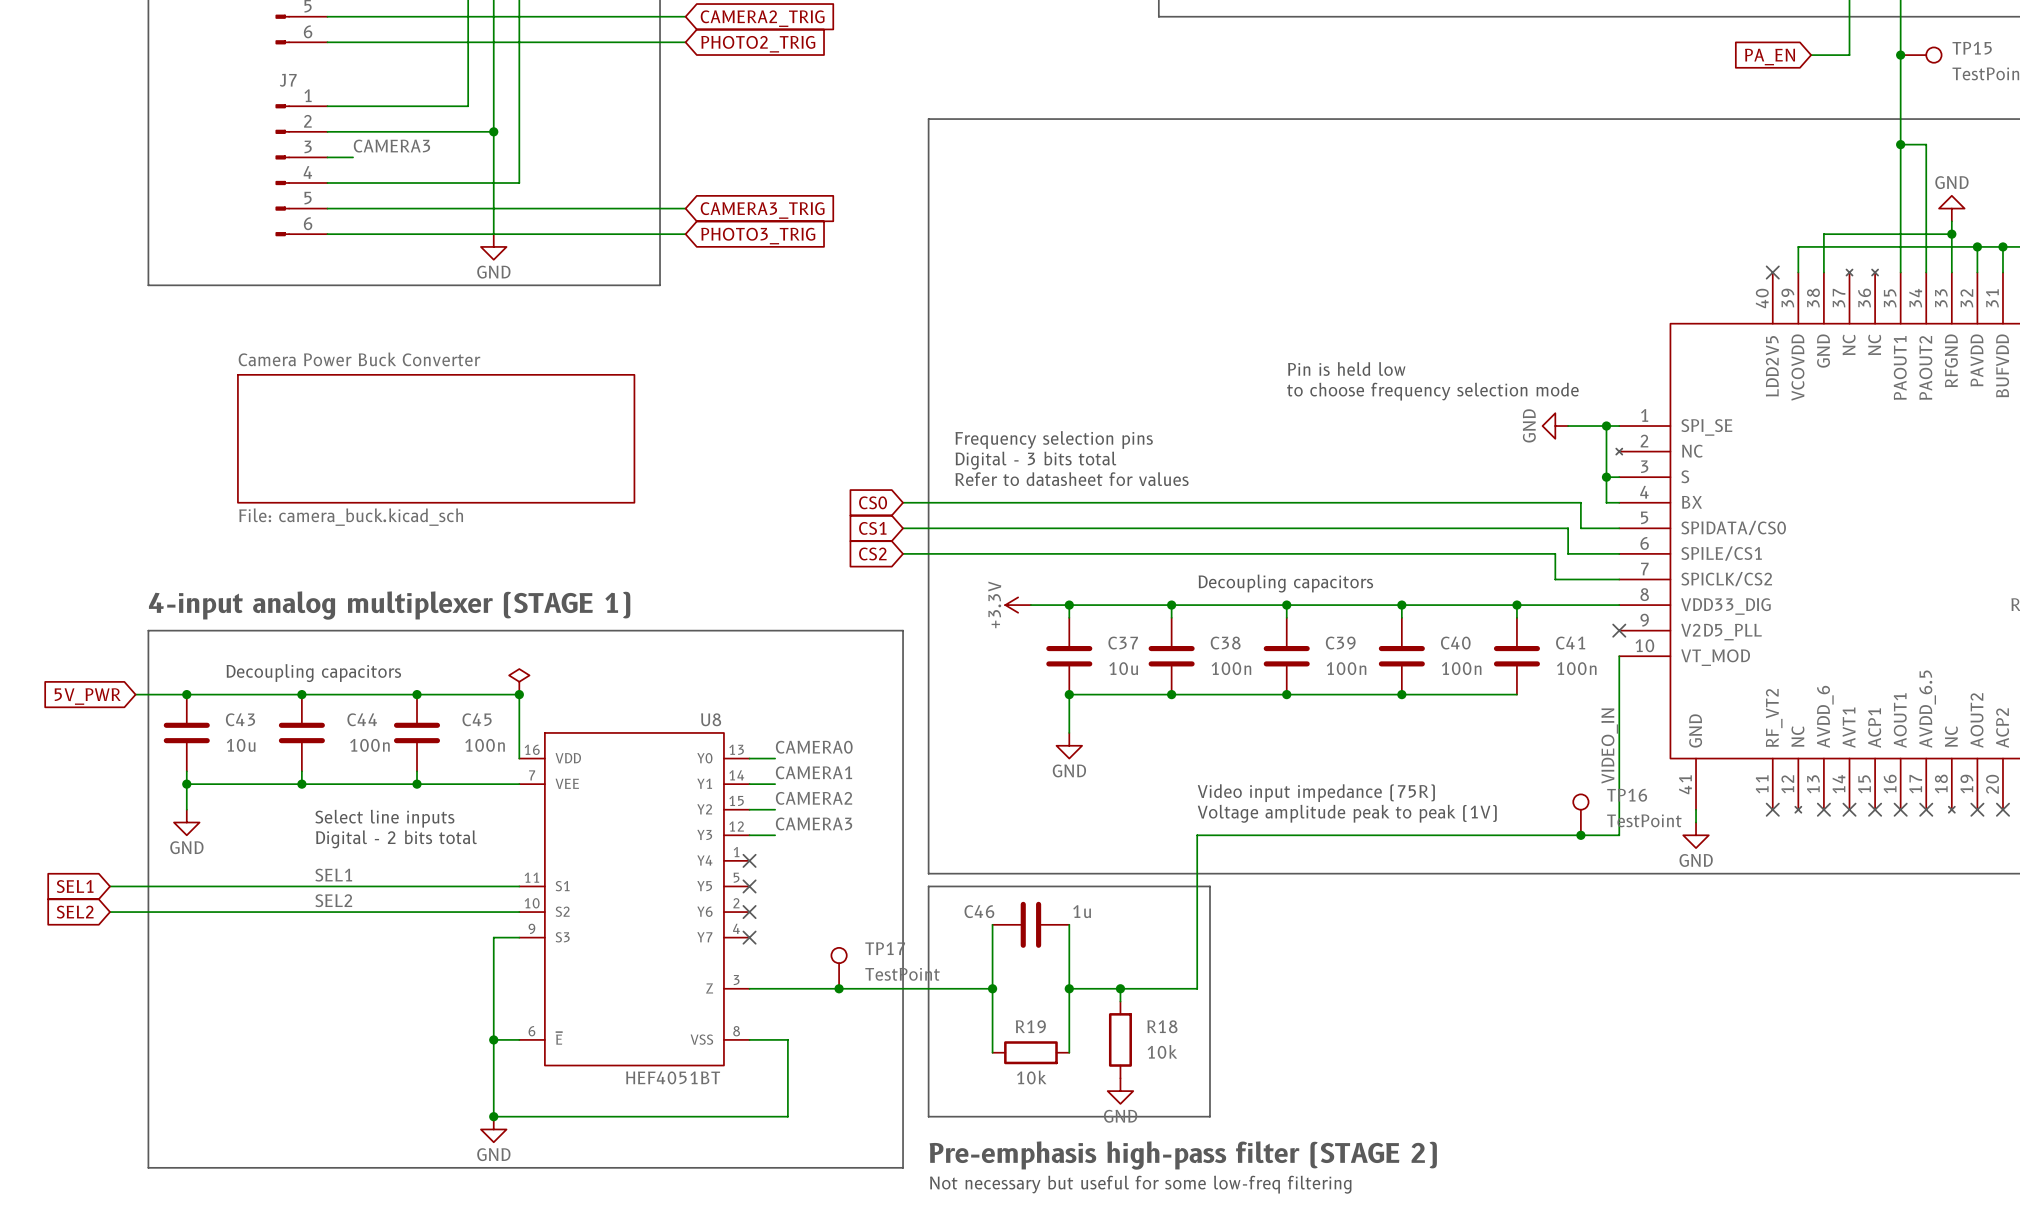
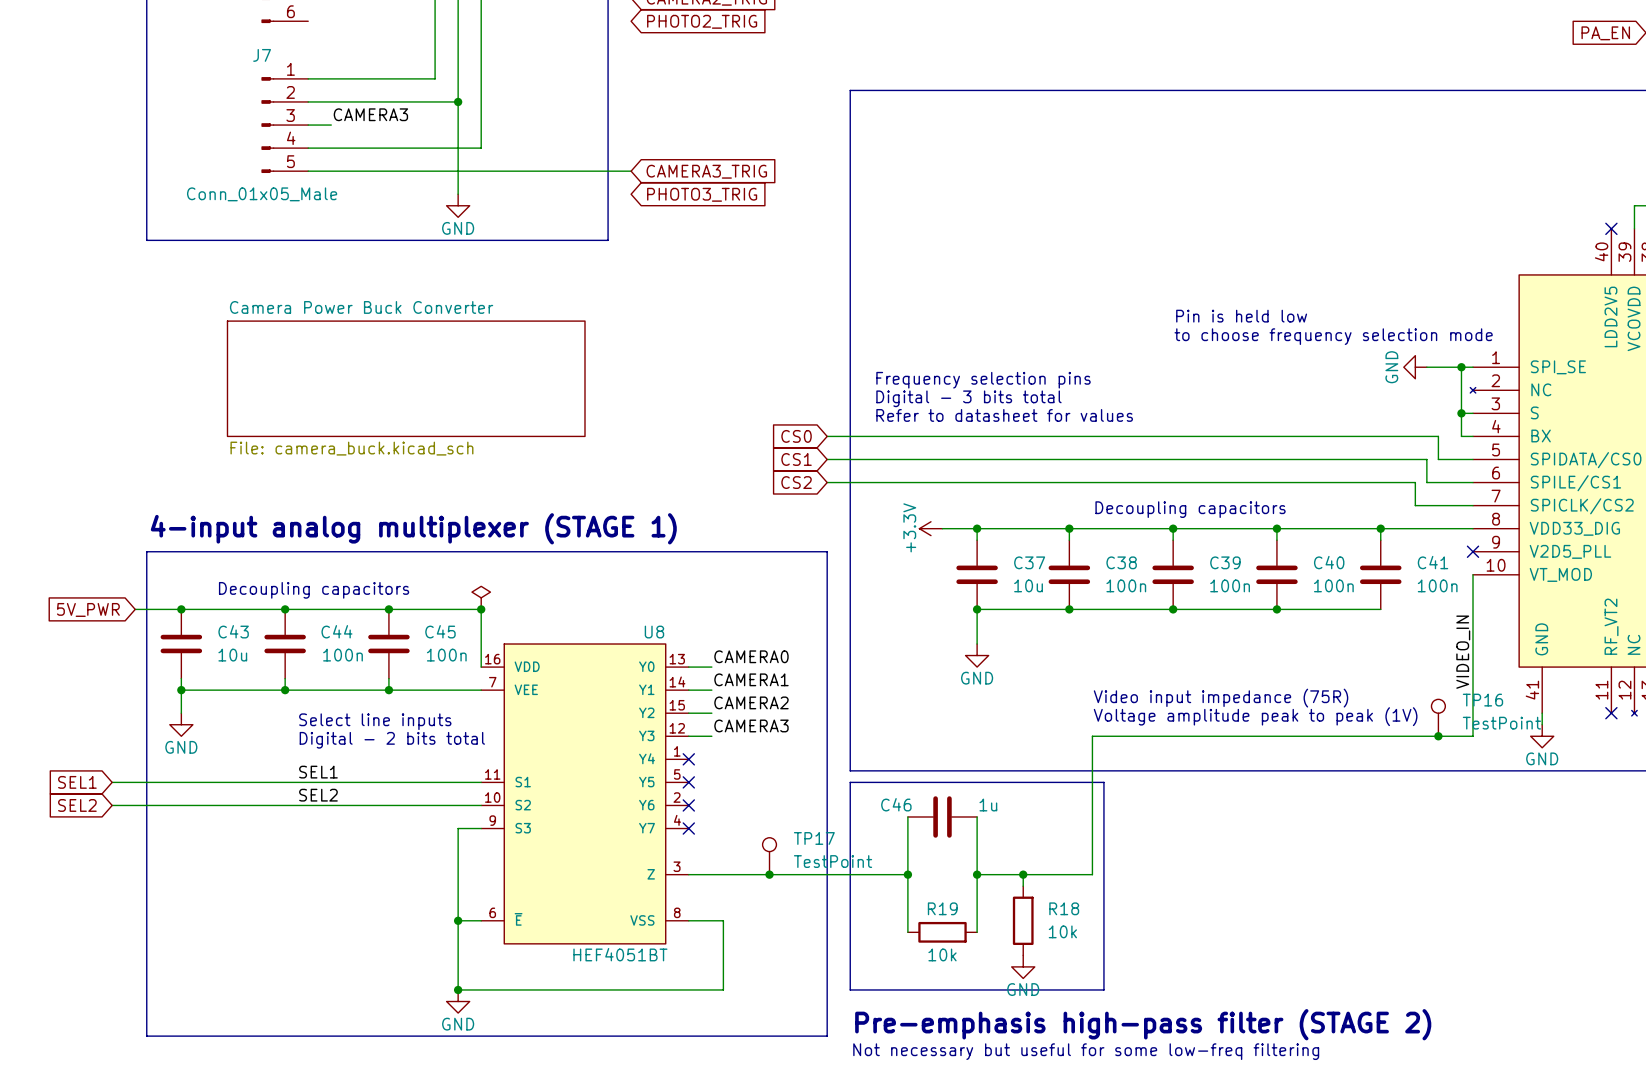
wire: (327, 42) (685, 42) -> none
J7 symbol: [275, 104, 328, 237] -> [261, 77, 309, 174]
wire: (327, 234) (685, 234) -> none
J7 value: none -> Conn_01x05_Male (262, 194)

